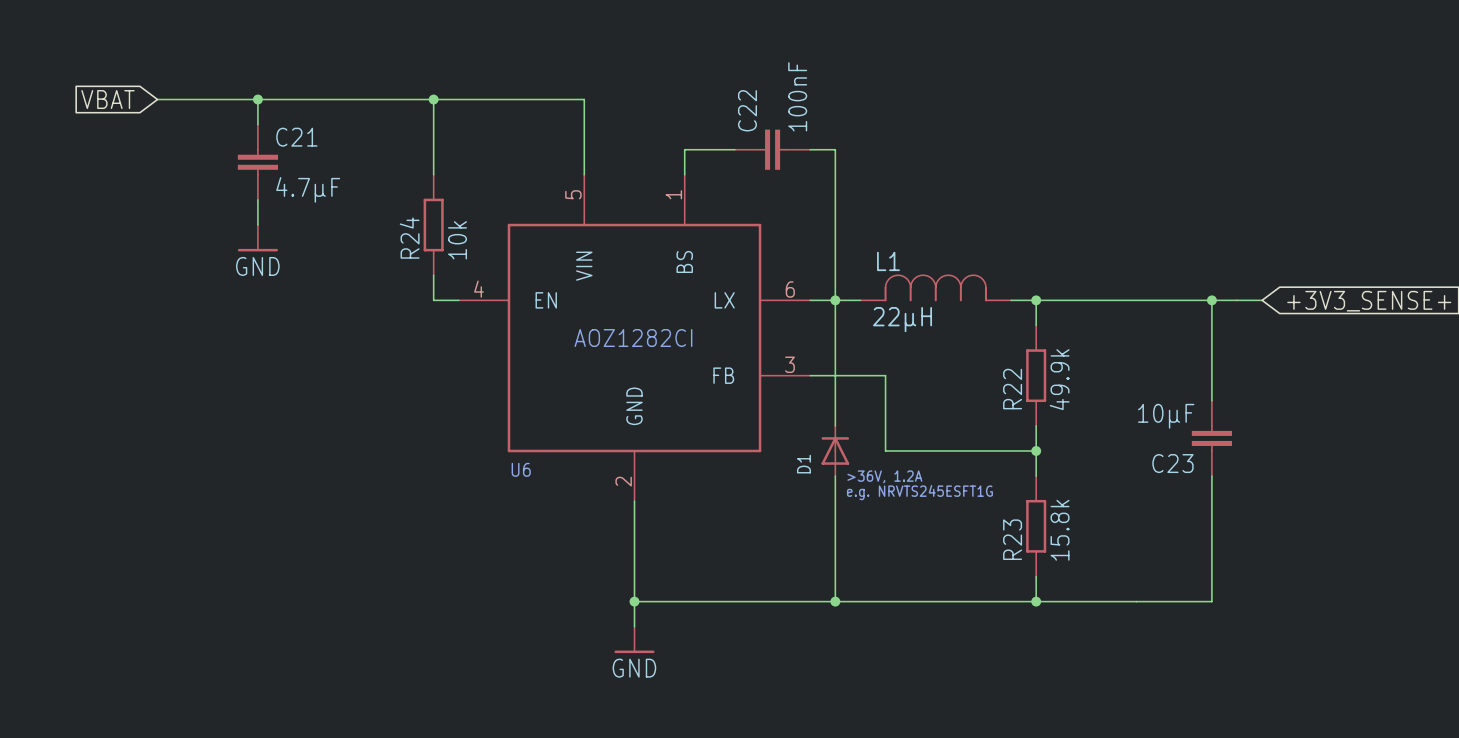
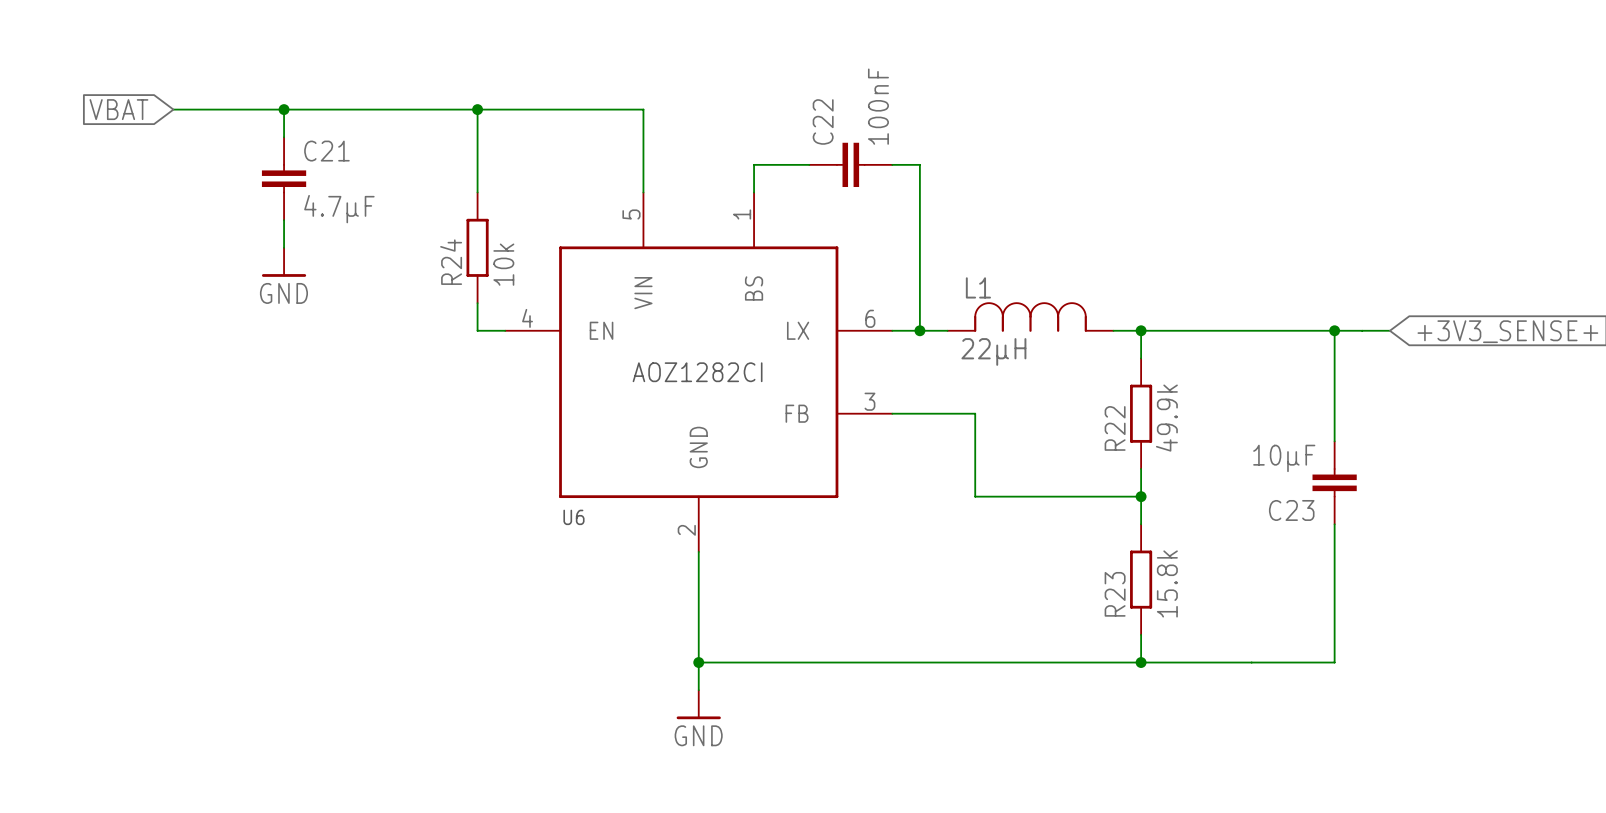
wire: (835, 300) (835, 425) -> none
D1: (835, 450) -> none
wire: (835, 476) (835, 601) -> none
text: >36V, 1.2A (884, 476) -> none
text: e.g. NRVTS245ESFT1G (919, 492) -> none
junction: (835, 601) -> none

